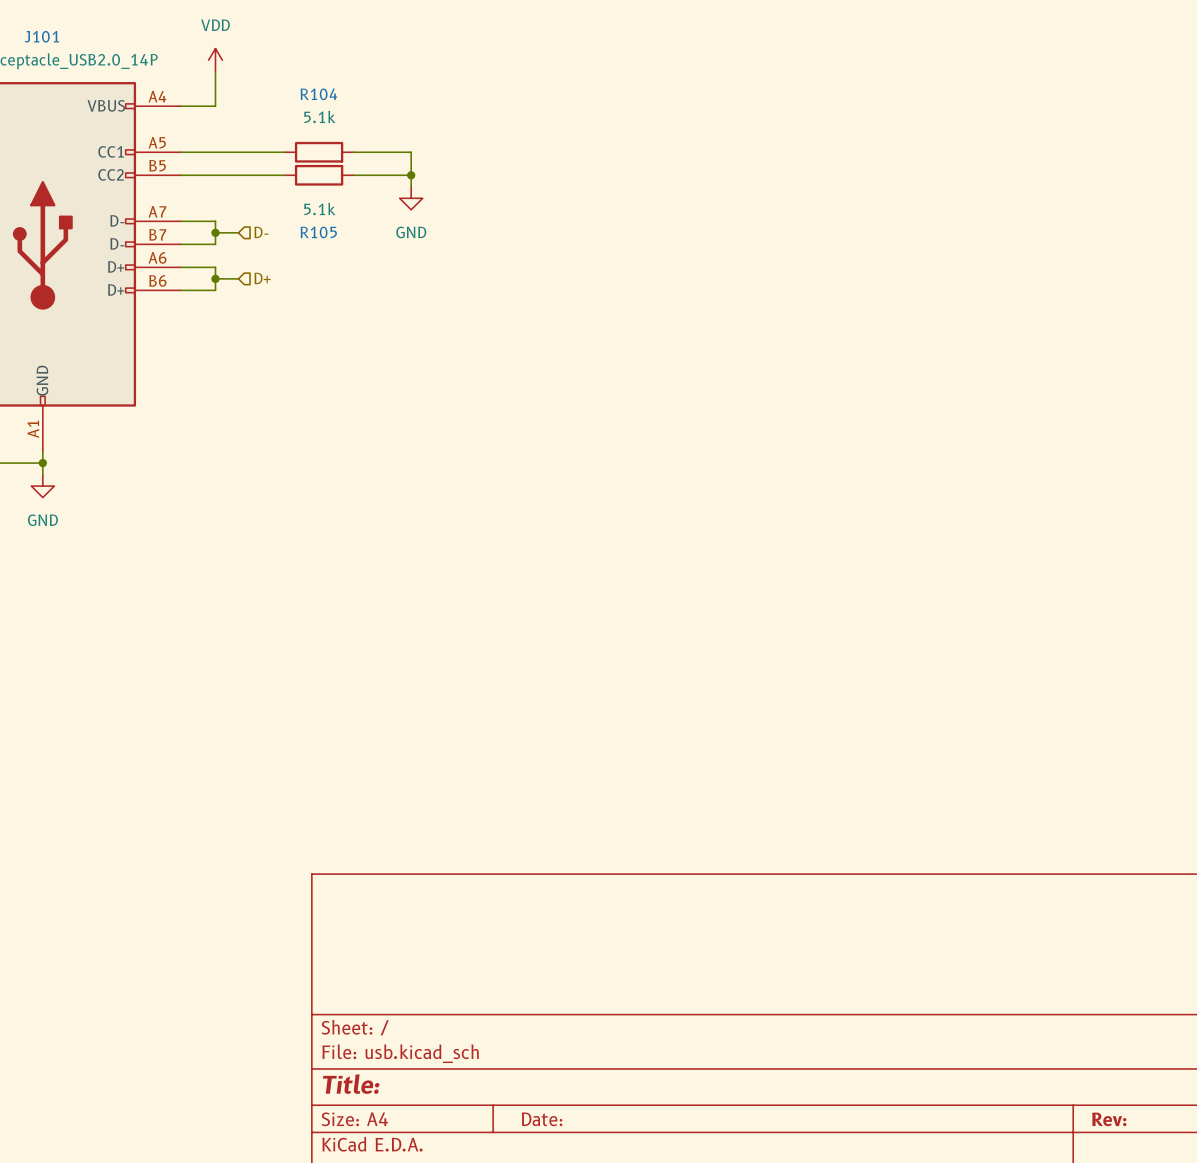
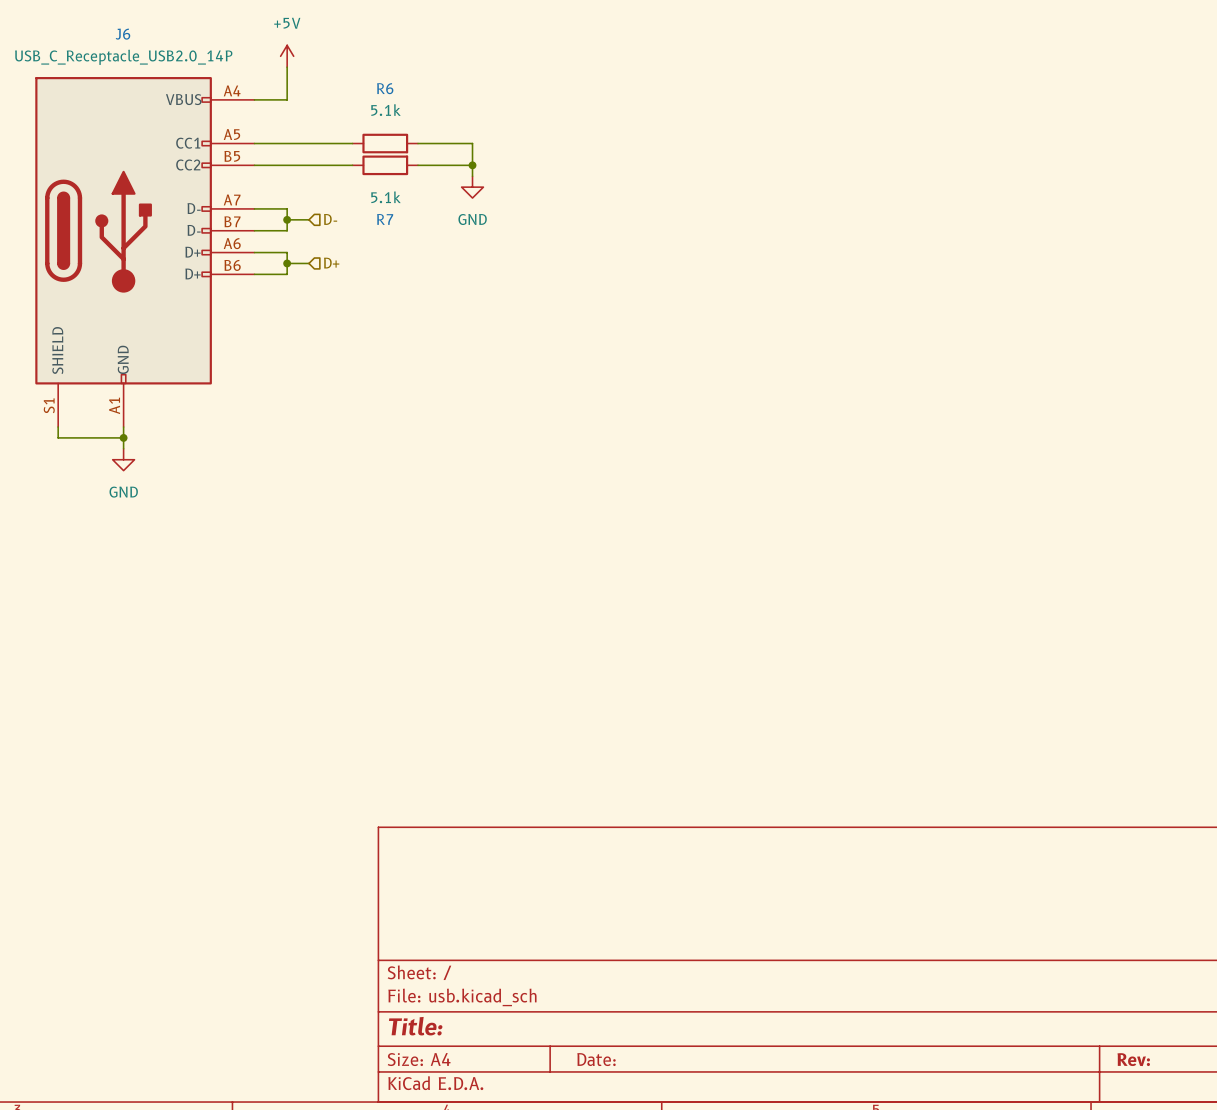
J101 name: J101 (41, 36) -> J6 (122, 34)
power symbol: VDD (215, 60) -> +5V (287, 56)
R104 name: R104 (318, 94) -> R6 (385, 88)
R105 name: R105 (318, 232) -> R7 (385, 219)

